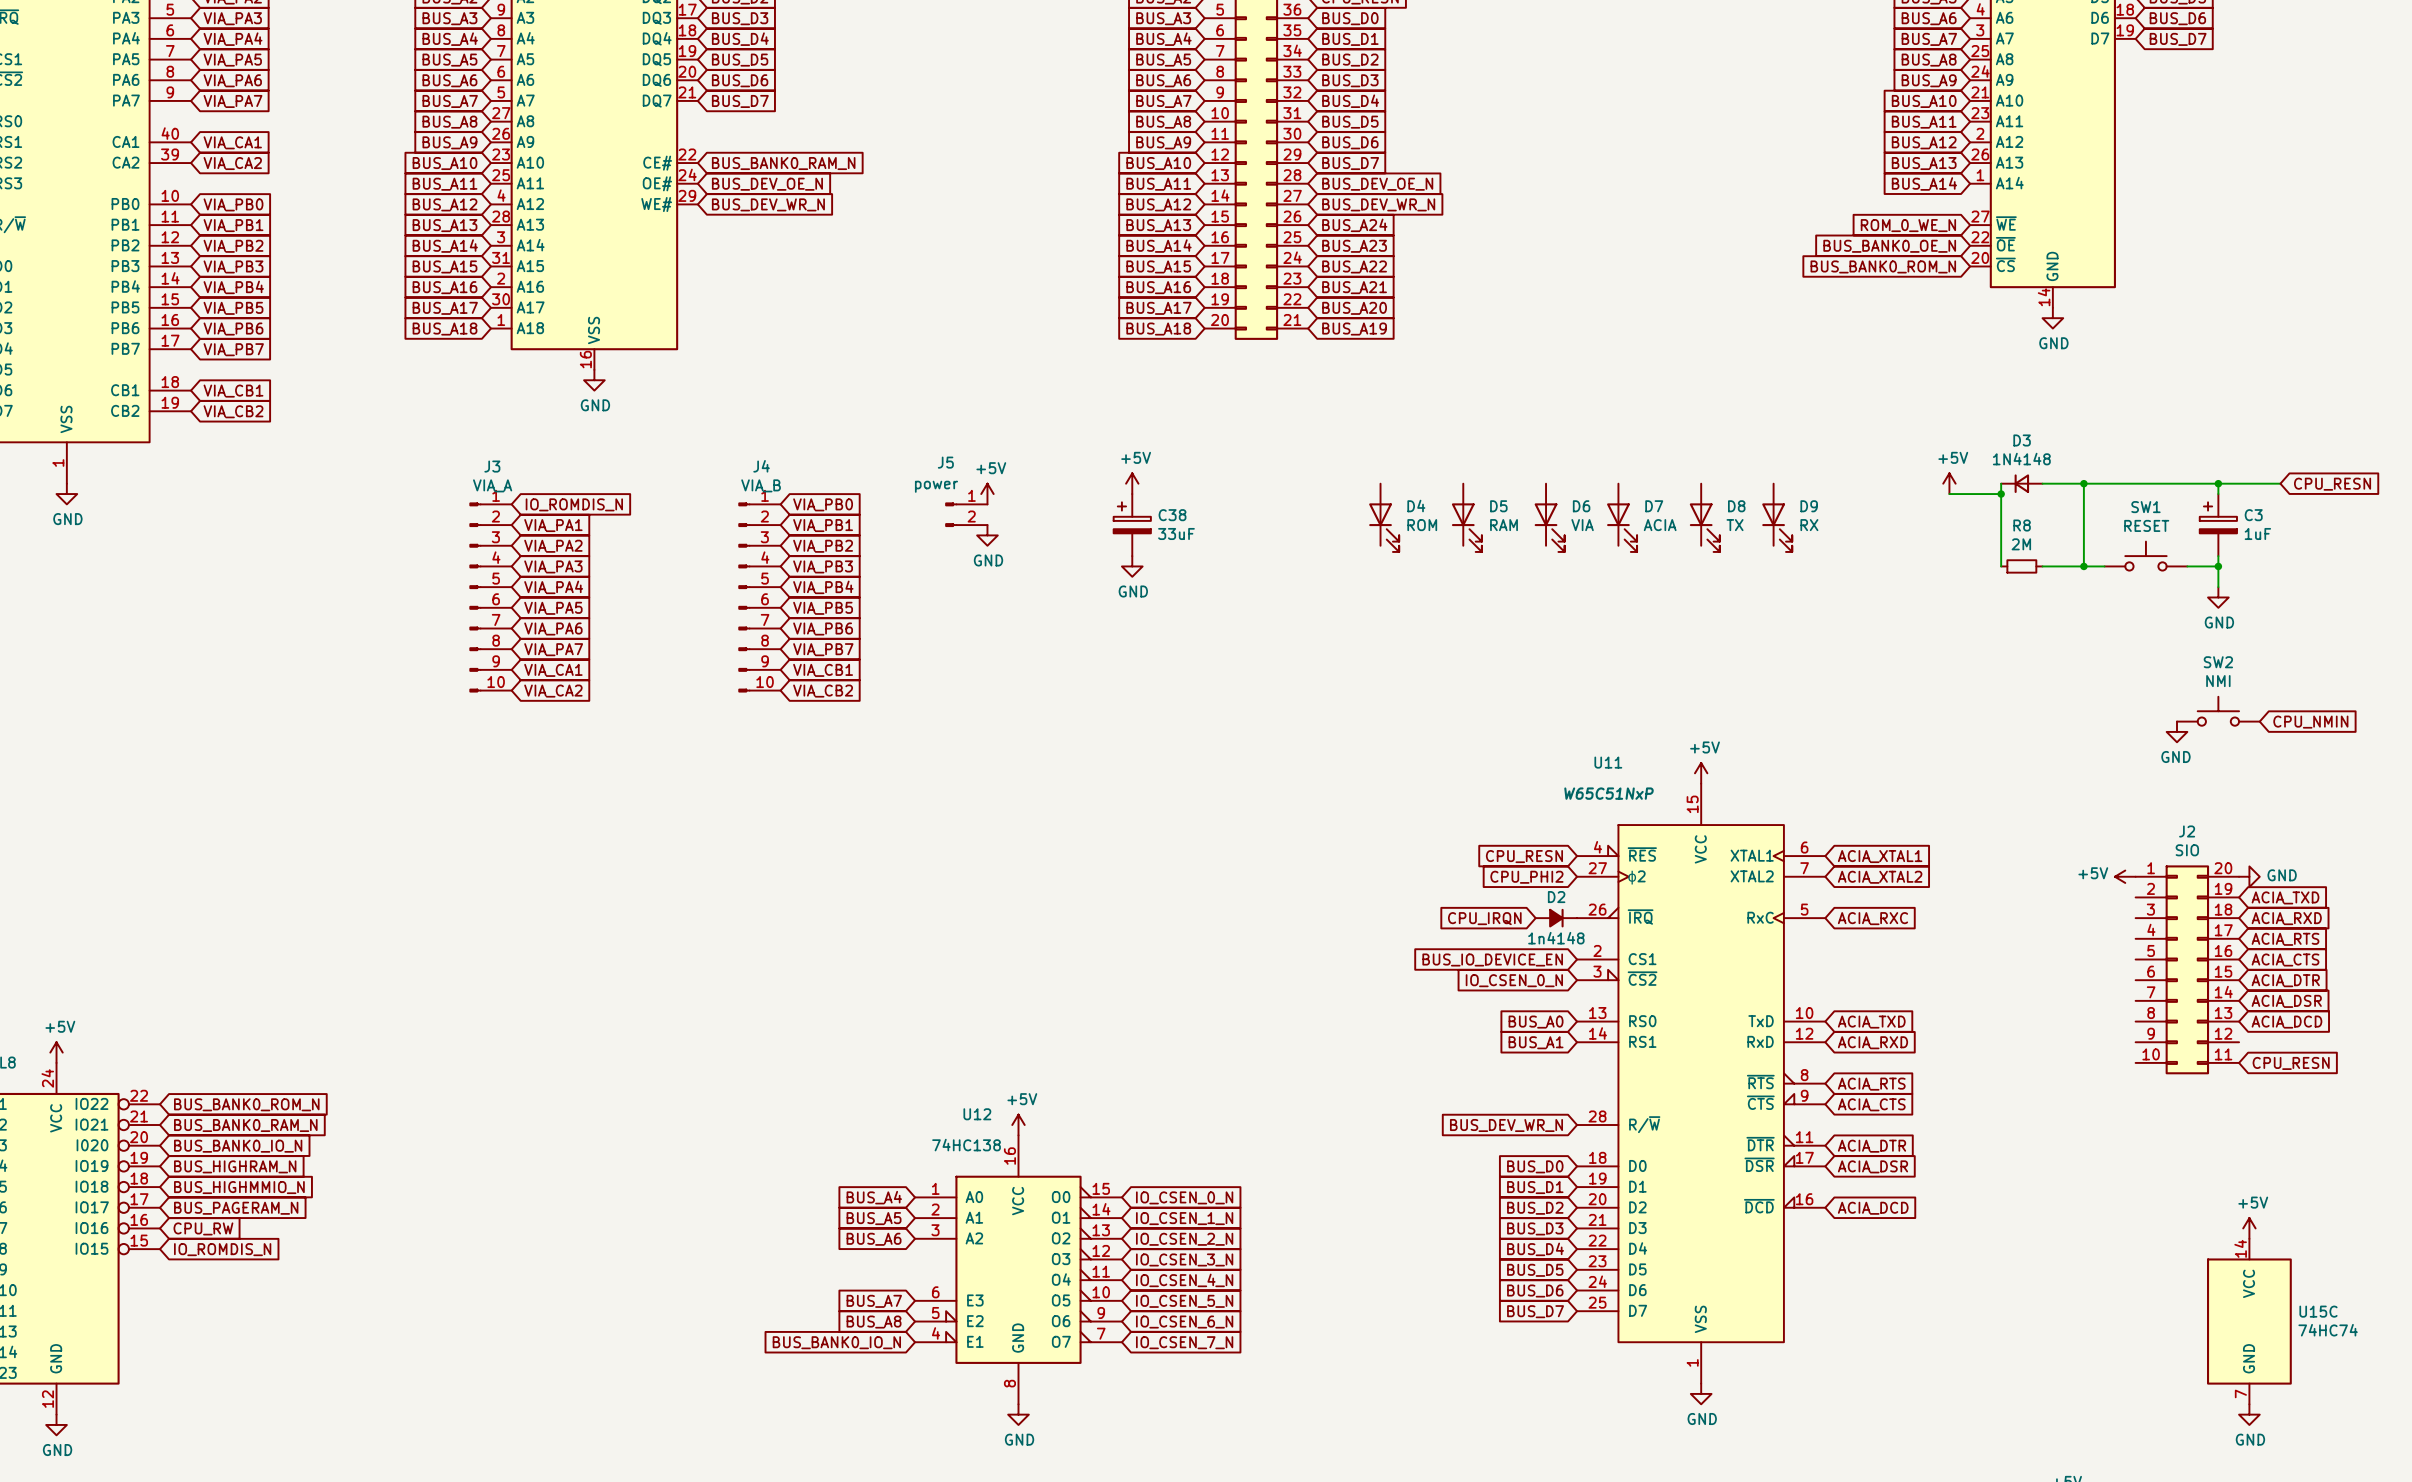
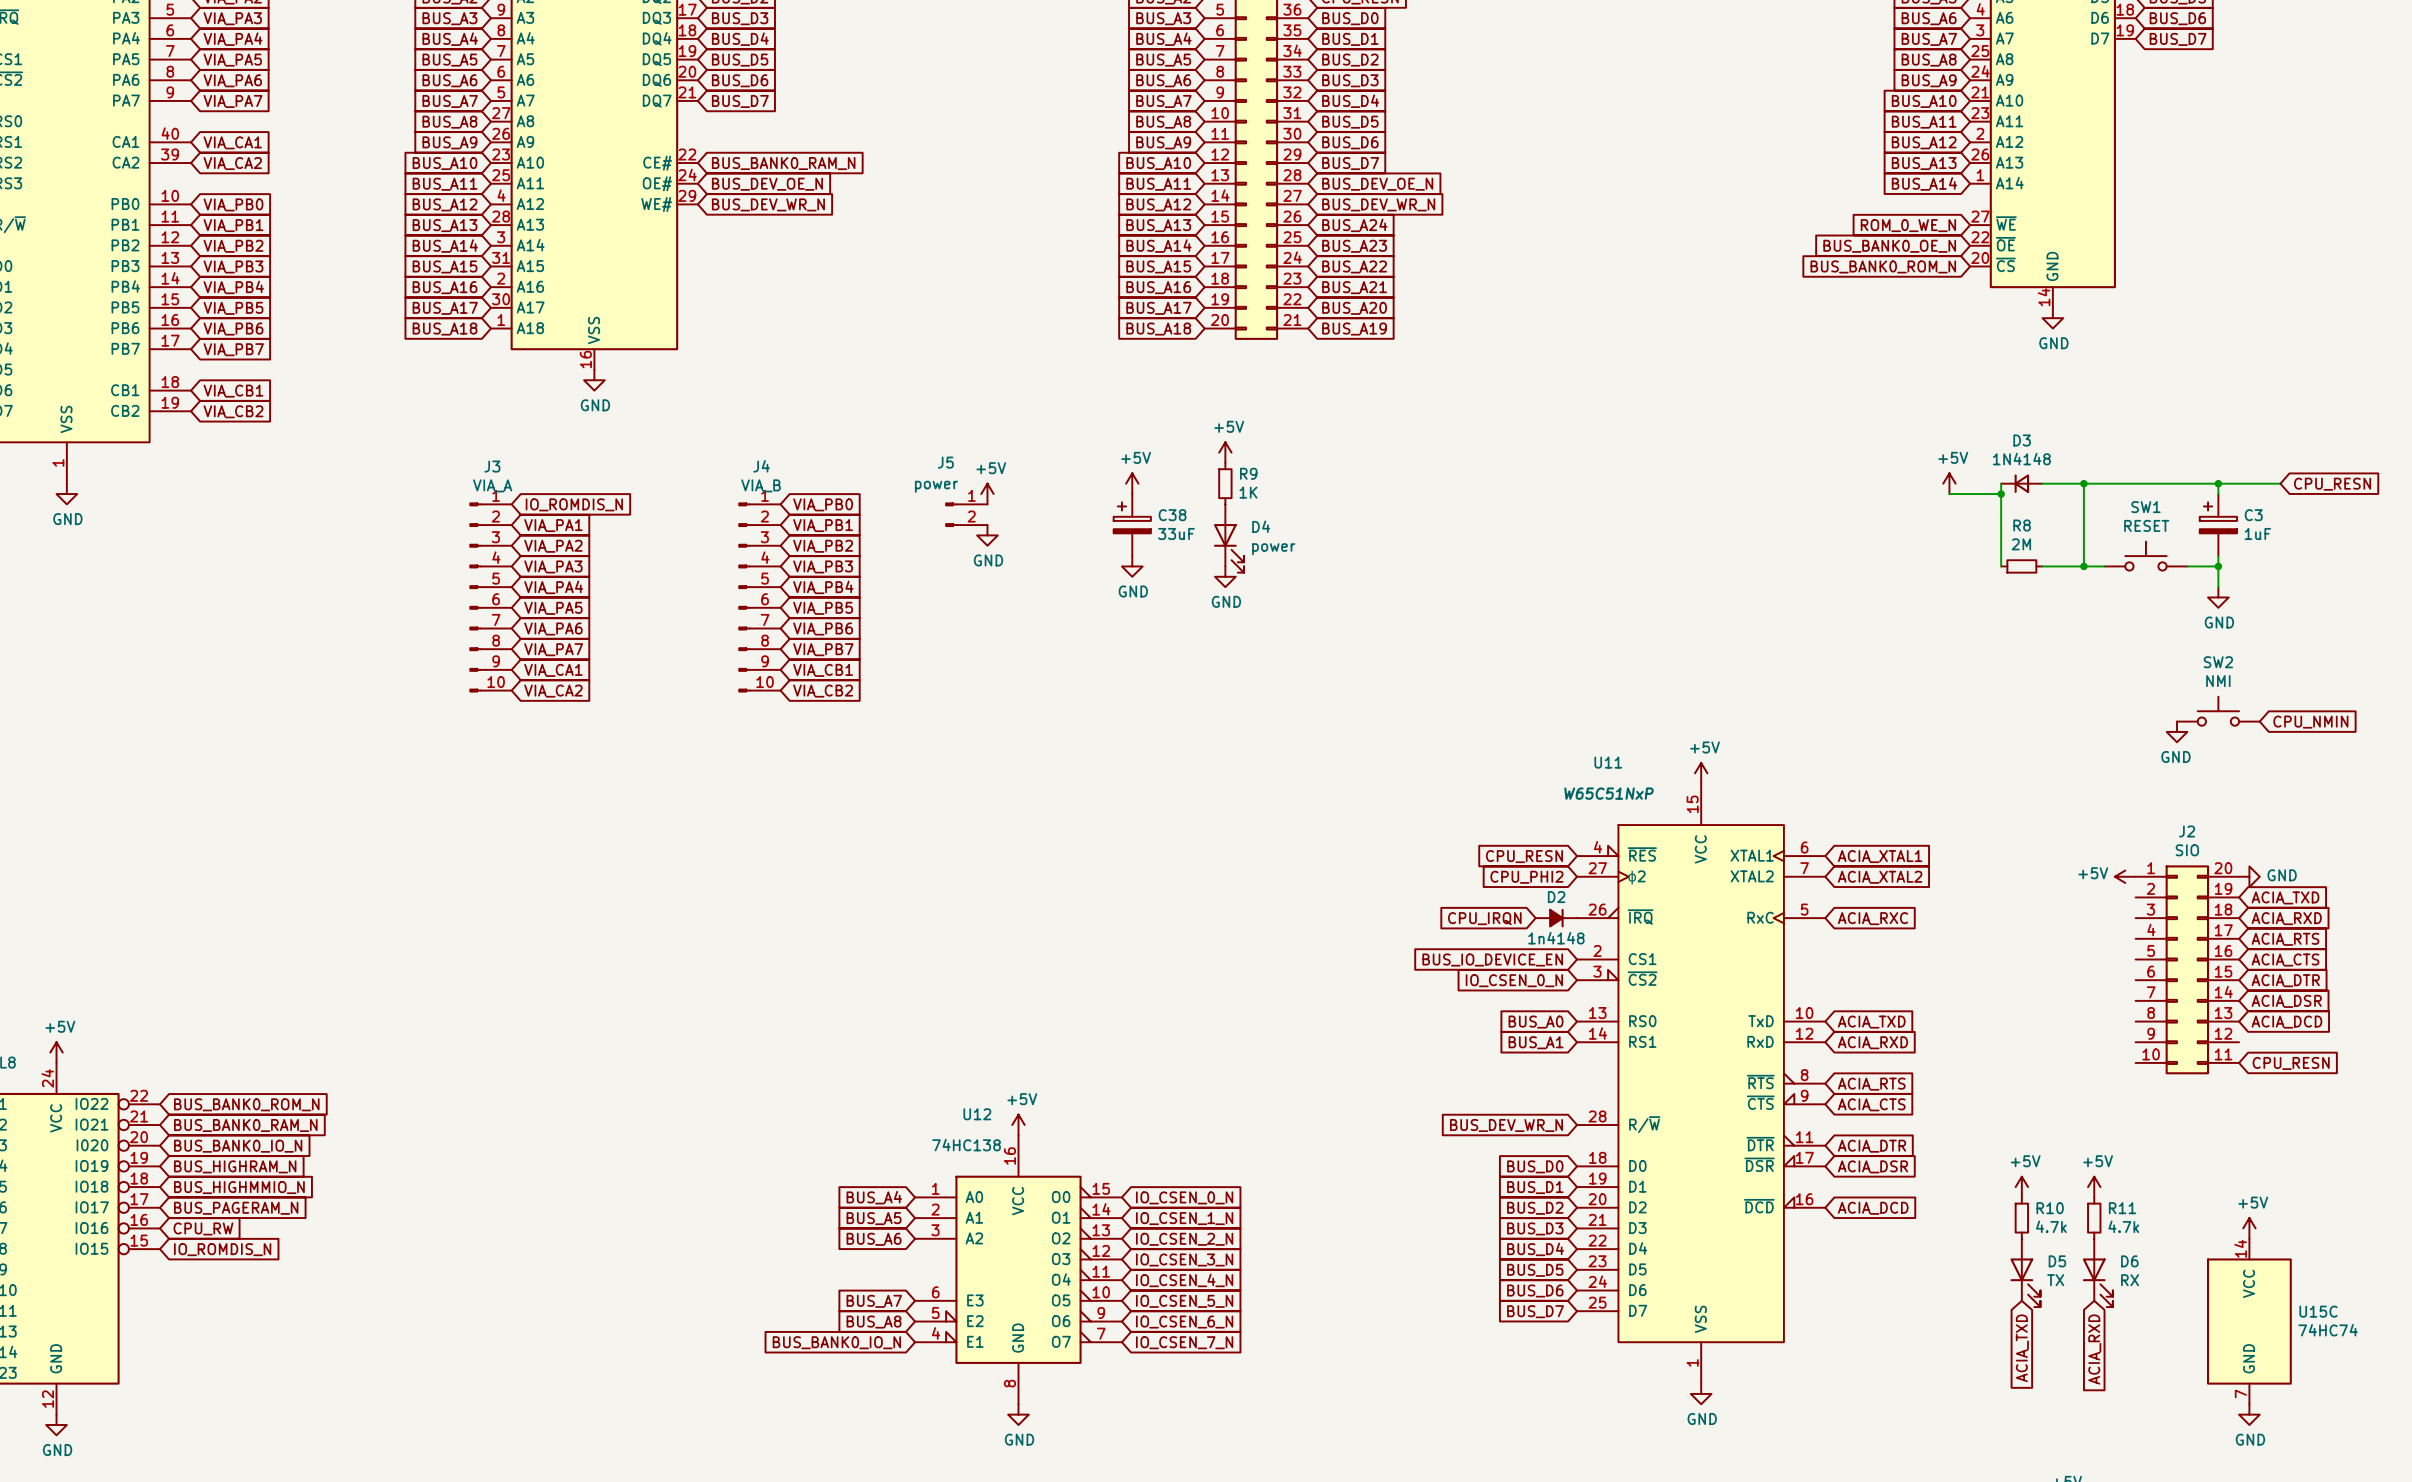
power symbol: none -> +5V (1225, 452)
R9: none -> 1K (1225, 483)
D4 position: (1384, 517) -> (1228, 538)
D5 position: (1466, 517) -> (2025, 1272)
D6 position: (1549, 517) -> (2097, 1272)
D7: ACIA (1622, 517) -> none
D8: TX (1704, 517) -> none
D9: RX (1777, 517) -> none
D4 value: ROM (1422, 525) -> power (1273, 549)
D5 value: RAM (1504, 525) -> TX (2055, 1280)
D6 value: VIA (1582, 525) -> RX (2130, 1280)
power symbol: none -> GND (1225, 576)
power symbol: none -> +5V (2021, 1187)
power symbol: none -> +5V (2094, 1187)
R10: none -> 4.7k (2021, 1218)
R11: none -> 4.7k (2094, 1218)
global label: none -> ACIA_TXD (2022, 1348)
global label: none -> ACIA_RXD (2094, 1349)

